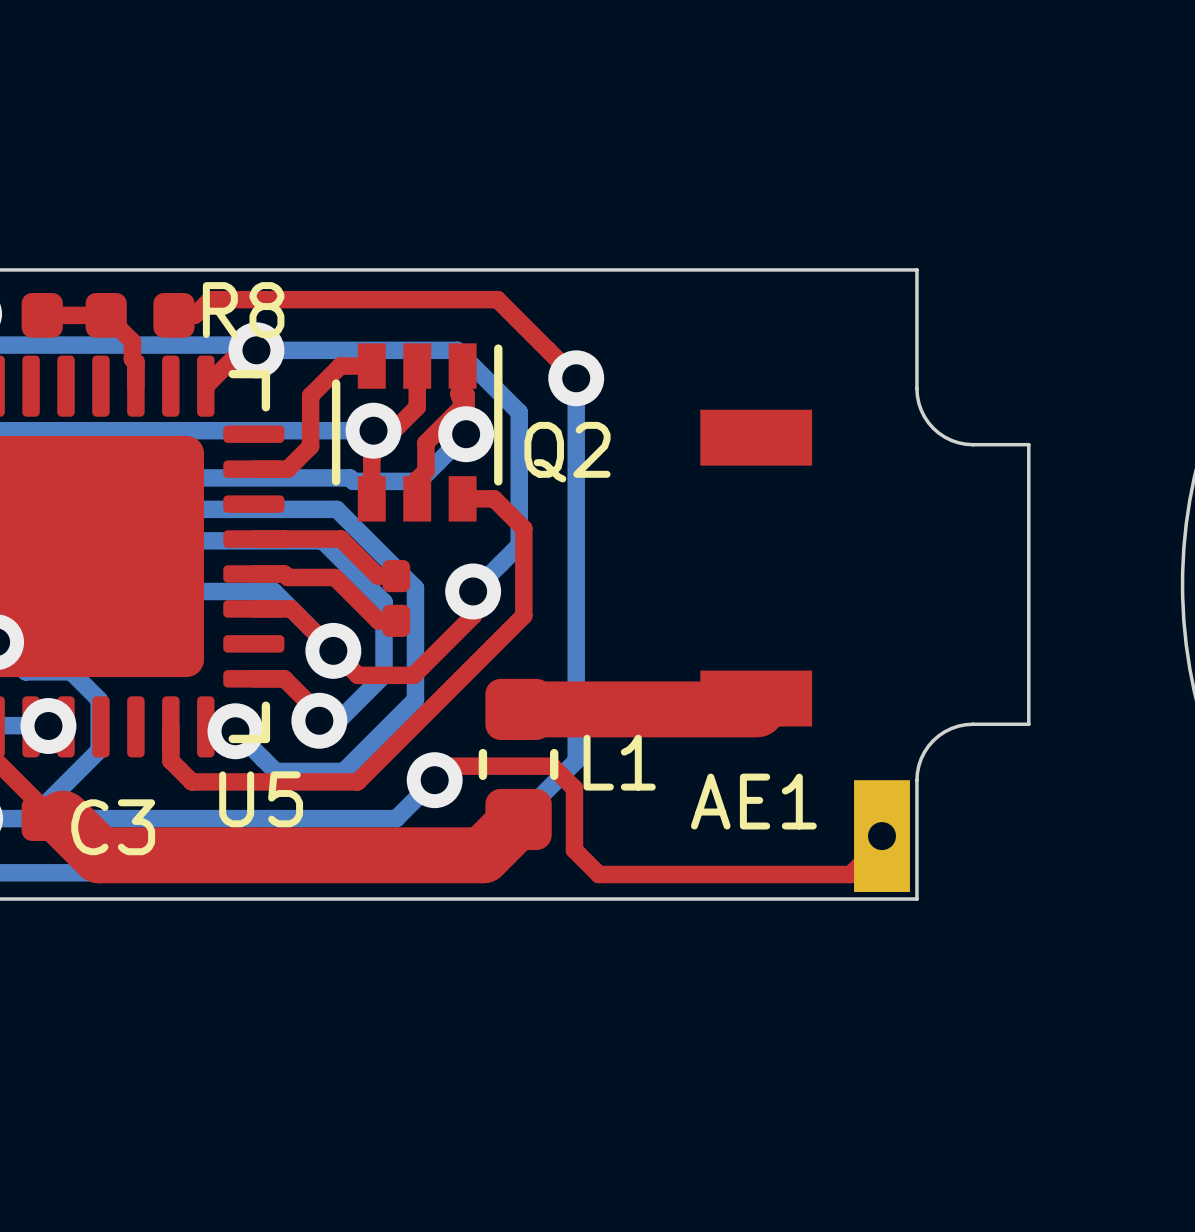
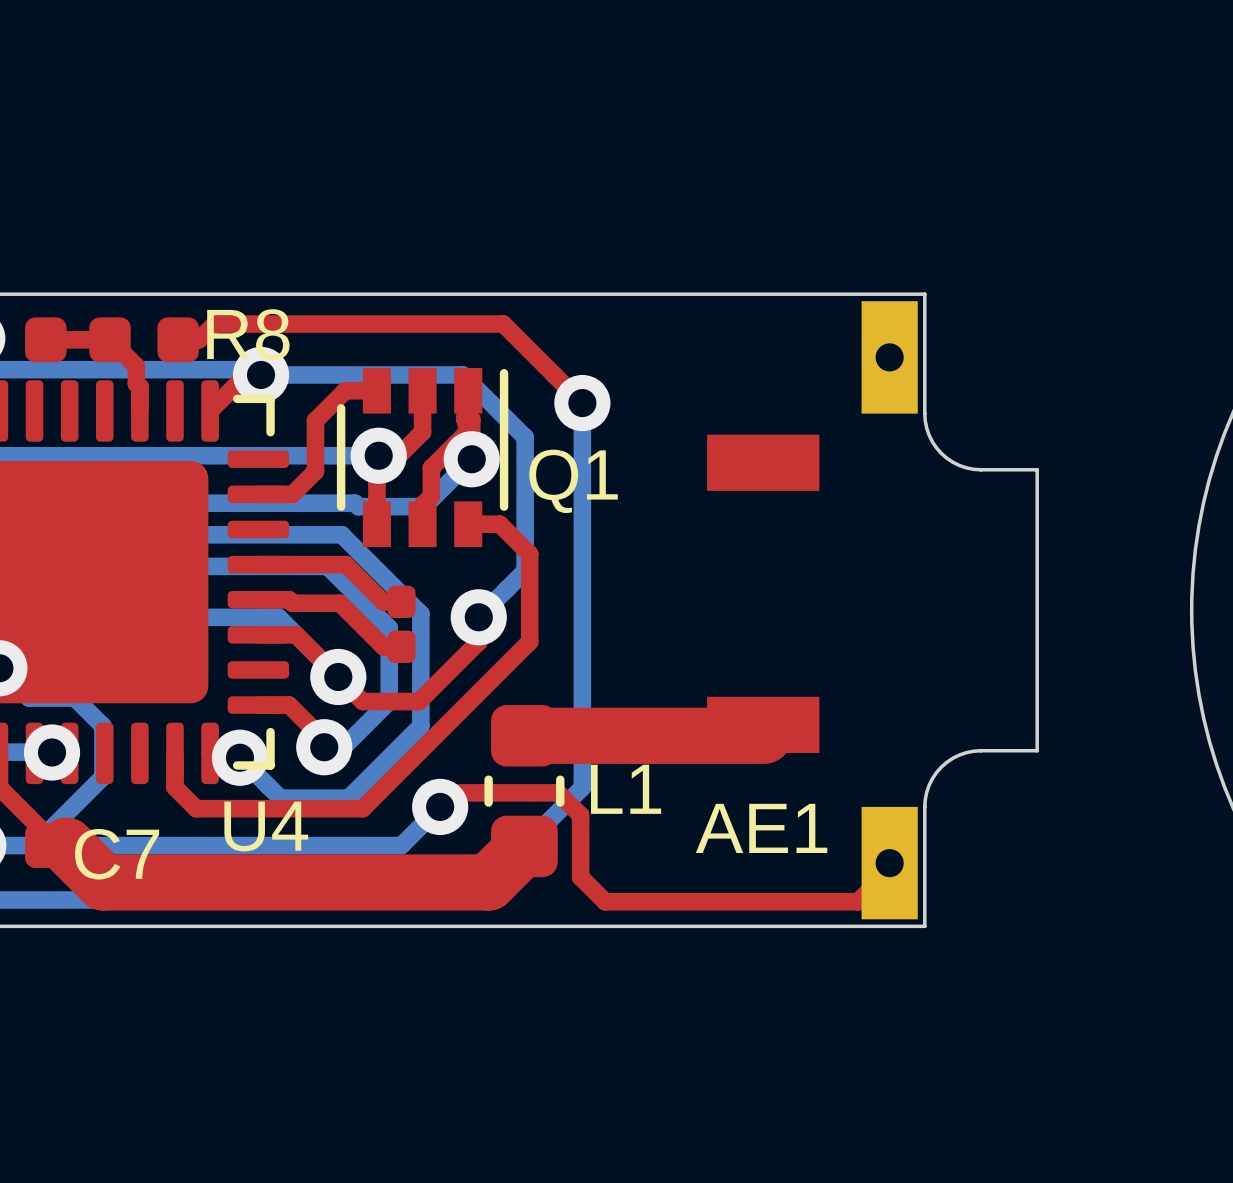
part: none -> (889, 357)
Q2 name: Q2 (567, 452) -> Q1 (573, 481)
U5 name: U5 (261, 799) -> U4 (266, 826)
C3 name: C3 (113, 827) -> C7 (117, 854)

